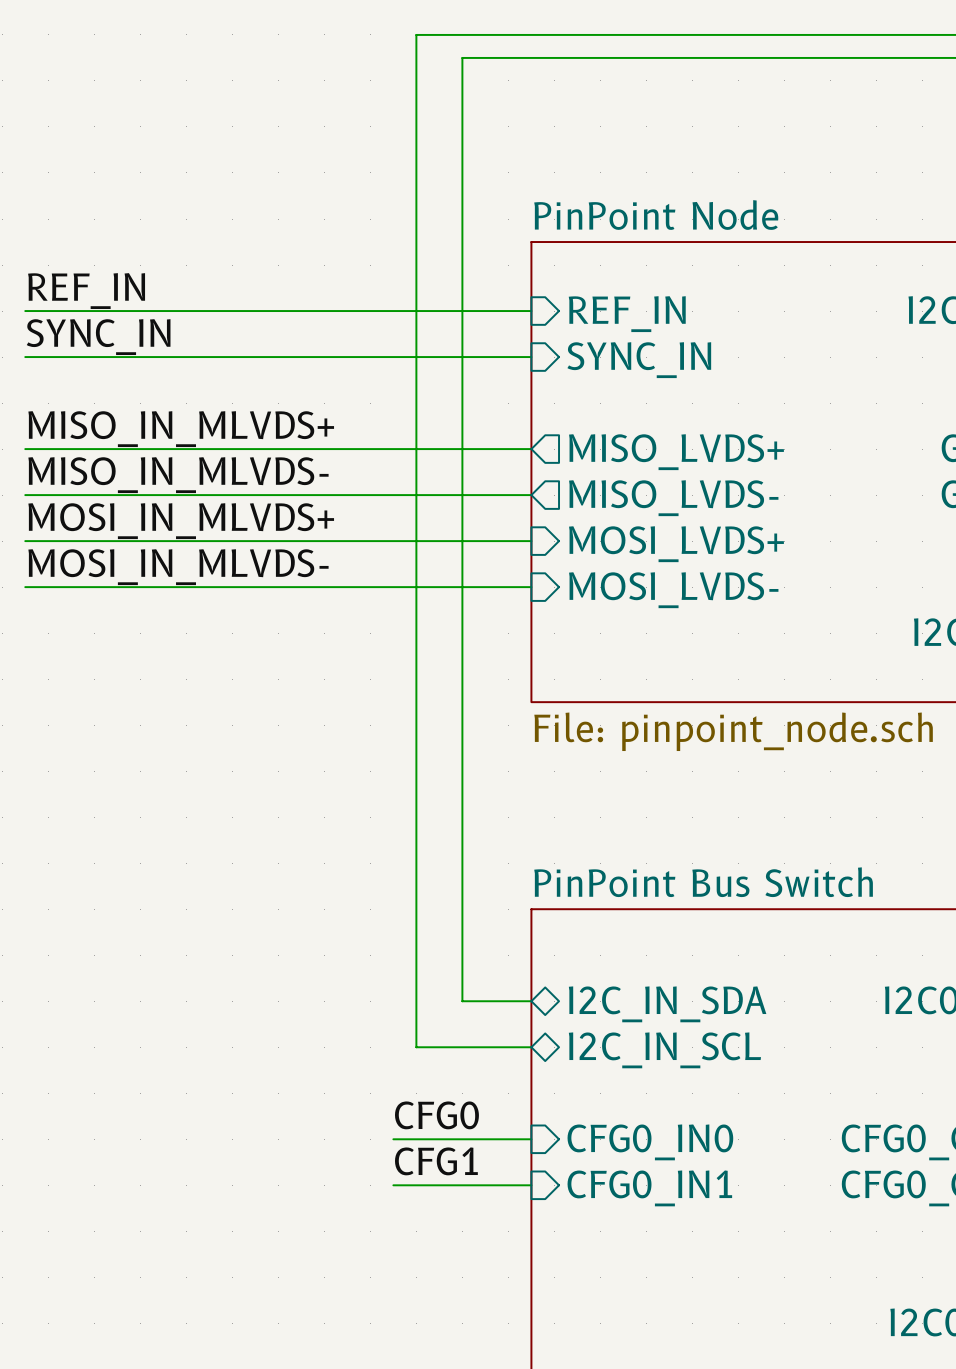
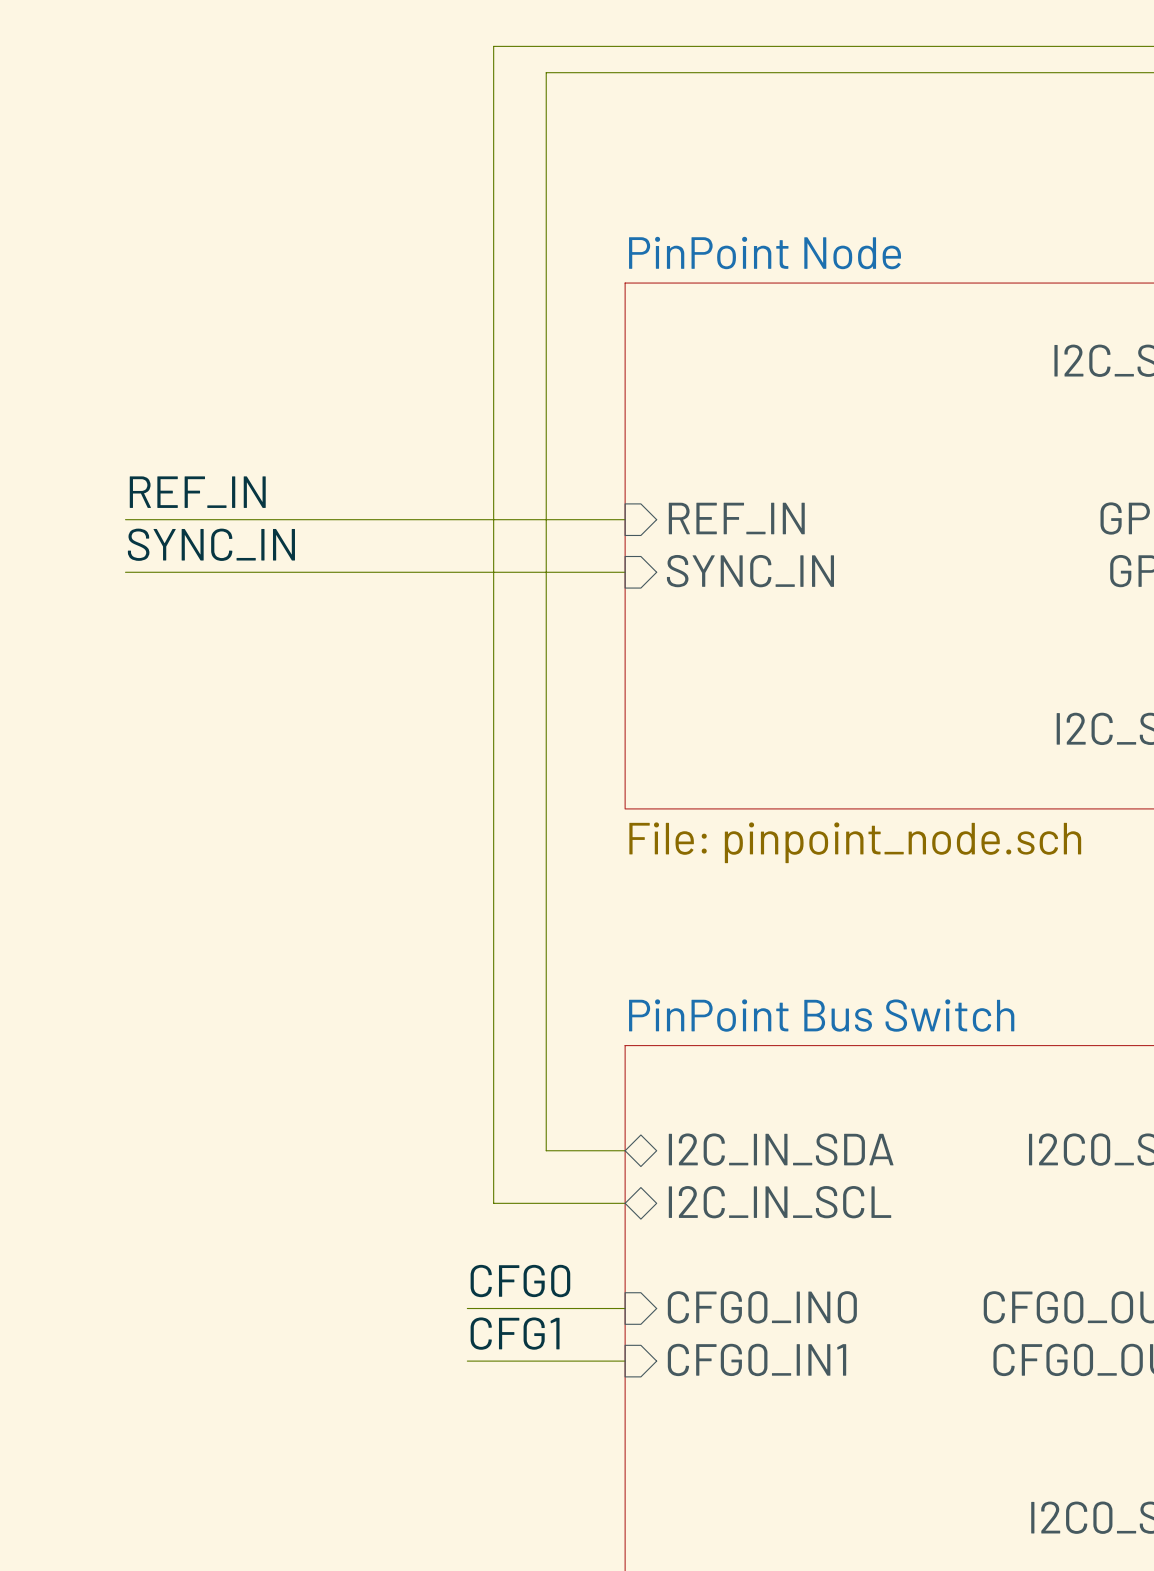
label position: REF_IN (86, 291) -> REF_IN (197, 492)
wire: (25, 311) (531, 311) -> none
sheet pin: REF_IN (627, 314) -> none
label position: SYNC_IN (98, 337) -> SYNC_IN (211, 544)
wire: (25, 357) (531, 357) -> none
sheet pin: SYNC_IN (639, 360) -> none
label: MISO_IN_MLVDS+ (181, 429) -> none
wire: (25, 449) (94, 449) -> none
sheet pin shape: output (676, 452) -> input (736, 518)
sheet pin: MISO_LVDS+ (676, 452) -> REF_IN (736, 518)
label: MISO_IN_MLVDS- (178, 475) -> none
wire: (25, 495) (94, 495) -> none
sheet pin shape: output (673, 498) -> input (750, 571)
sheet pin: MISO_LVDS- (673, 498) -> SYNC_IN (750, 571)
label: MOSI_IN_MLVDS+ (181, 521) -> none
wire: (25, 541) (531, 541) -> none
sheet pin: MOSI_LVDS+ (676, 544) -> none
label: MOSI_IN_MLVDS- (178, 567) -> none
wire: (25, 587) (531, 587) -> none
sheet pin: MOSI_LVDS- (673, 590) -> none

